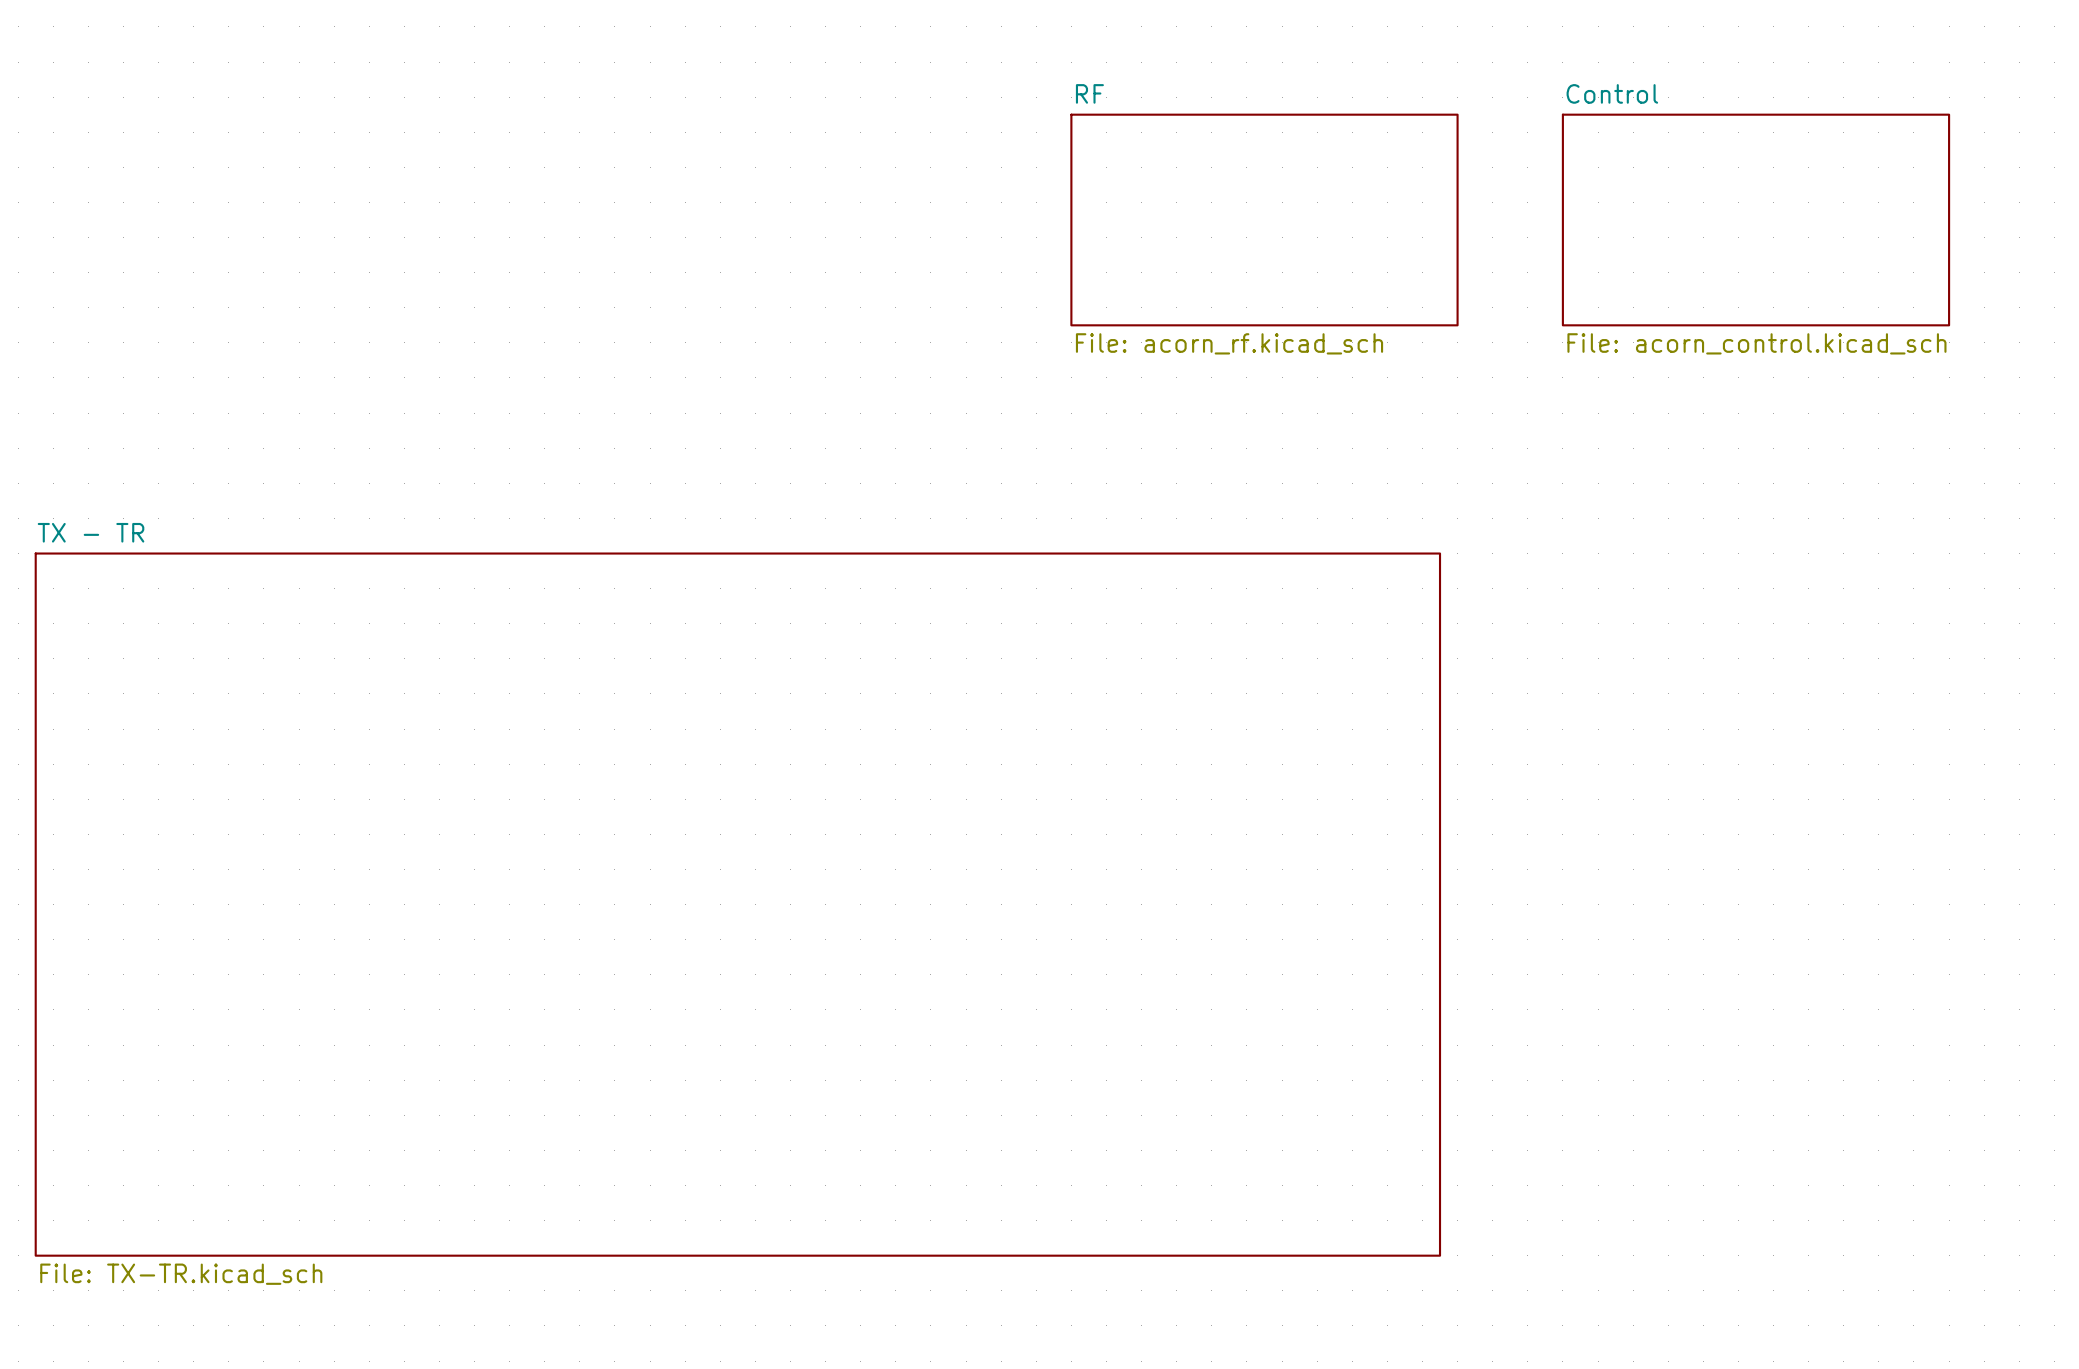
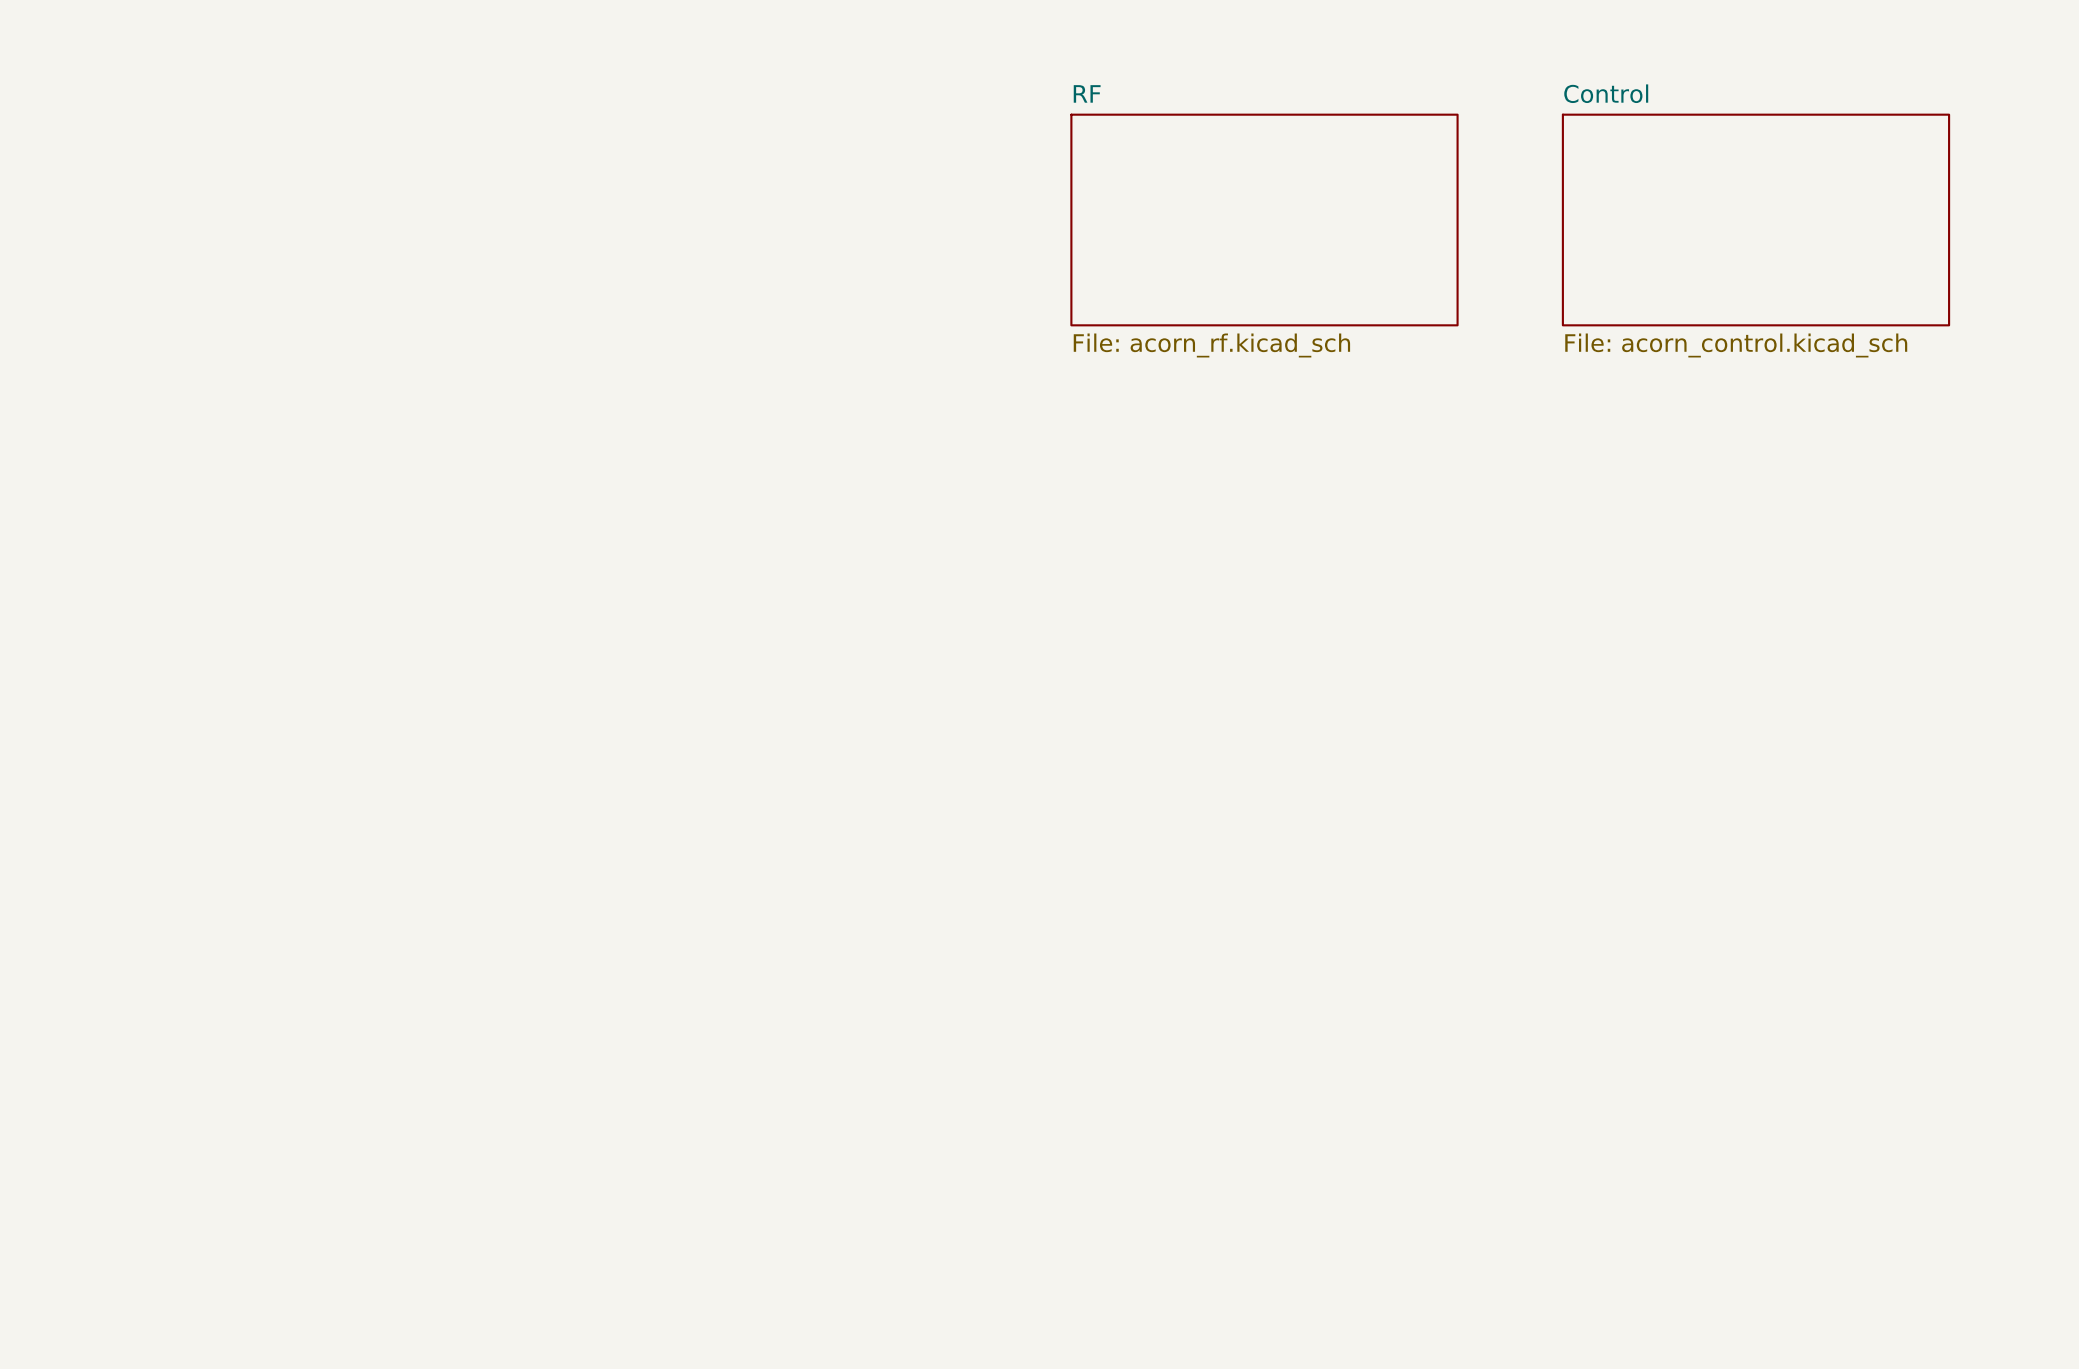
sheet TX - TR: File: TX-TR.kicad_sch (737, 904) -> none

